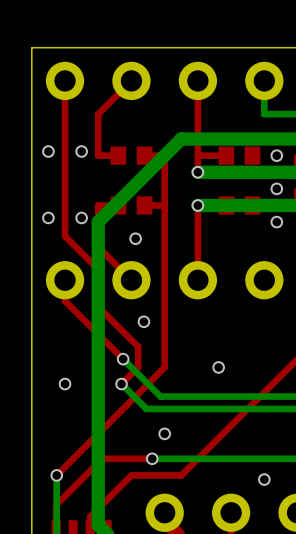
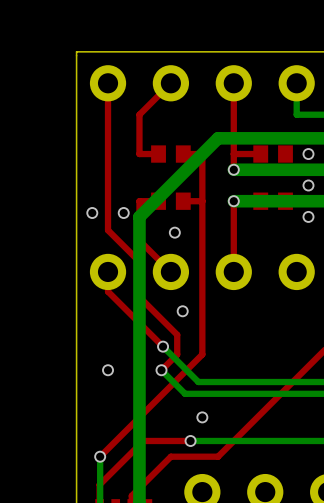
via: (48, 151) -> none
via: (81, 151) -> none
via: (218, 367) -> none
via: (264, 479) -> none

